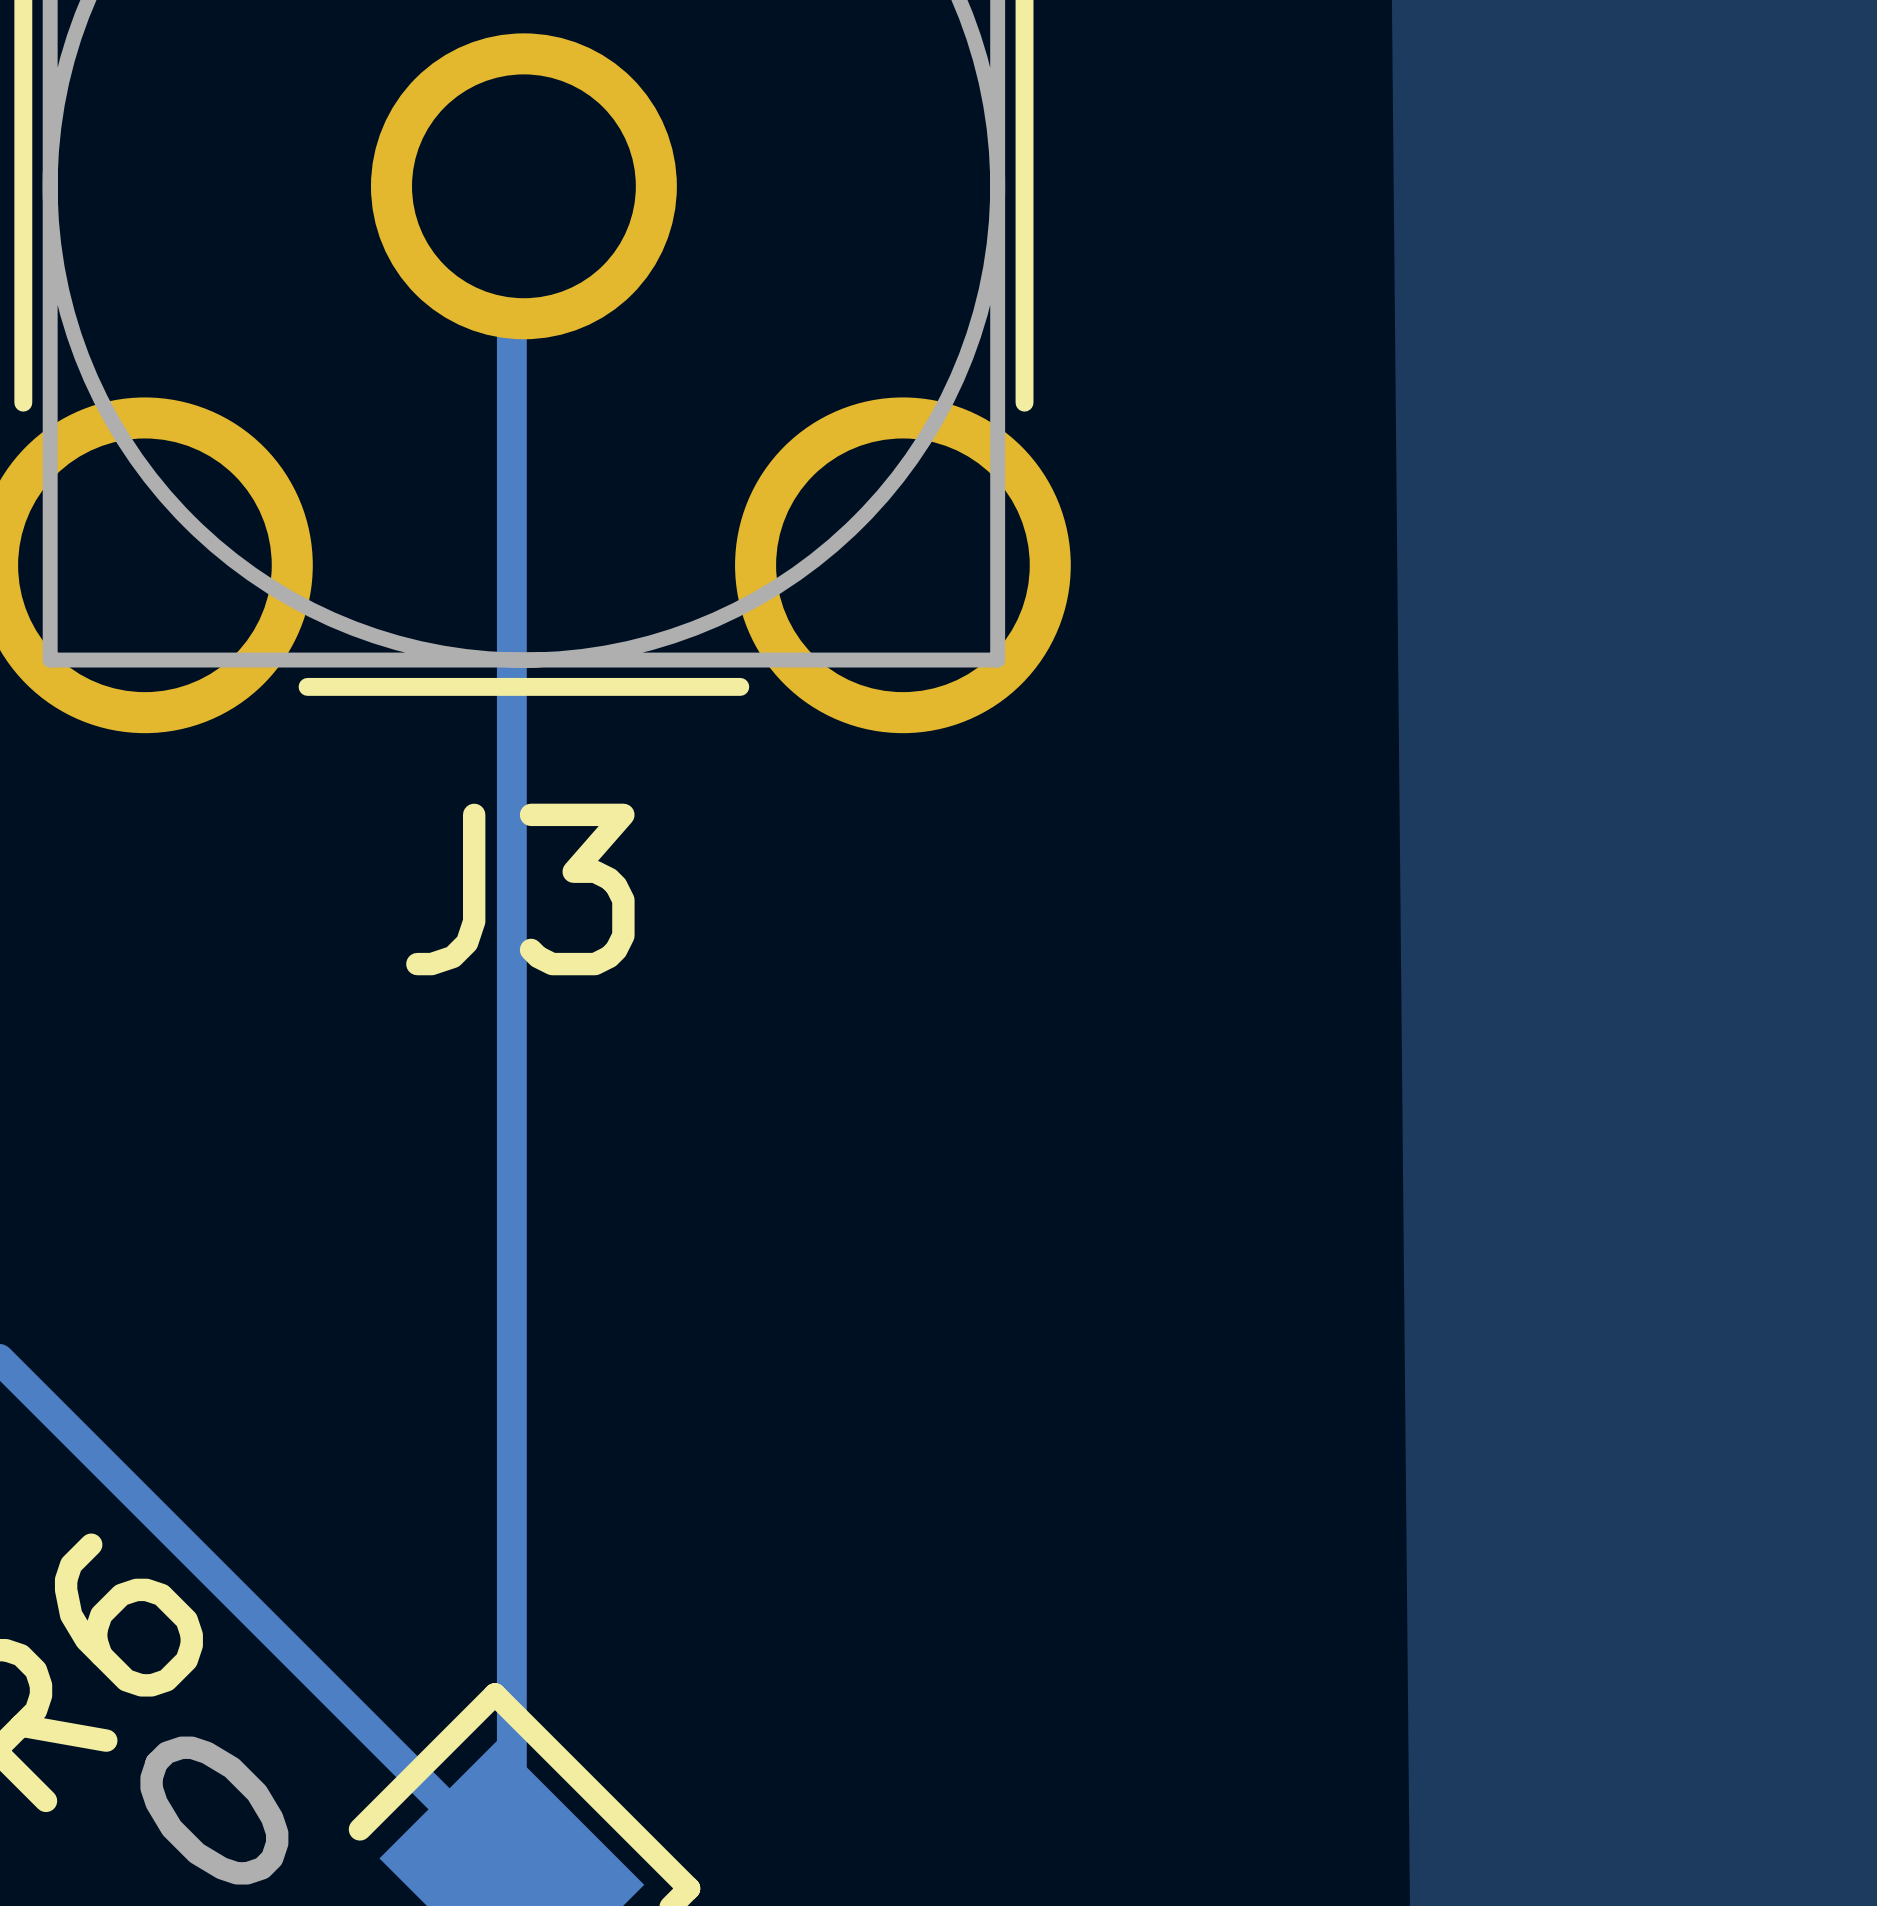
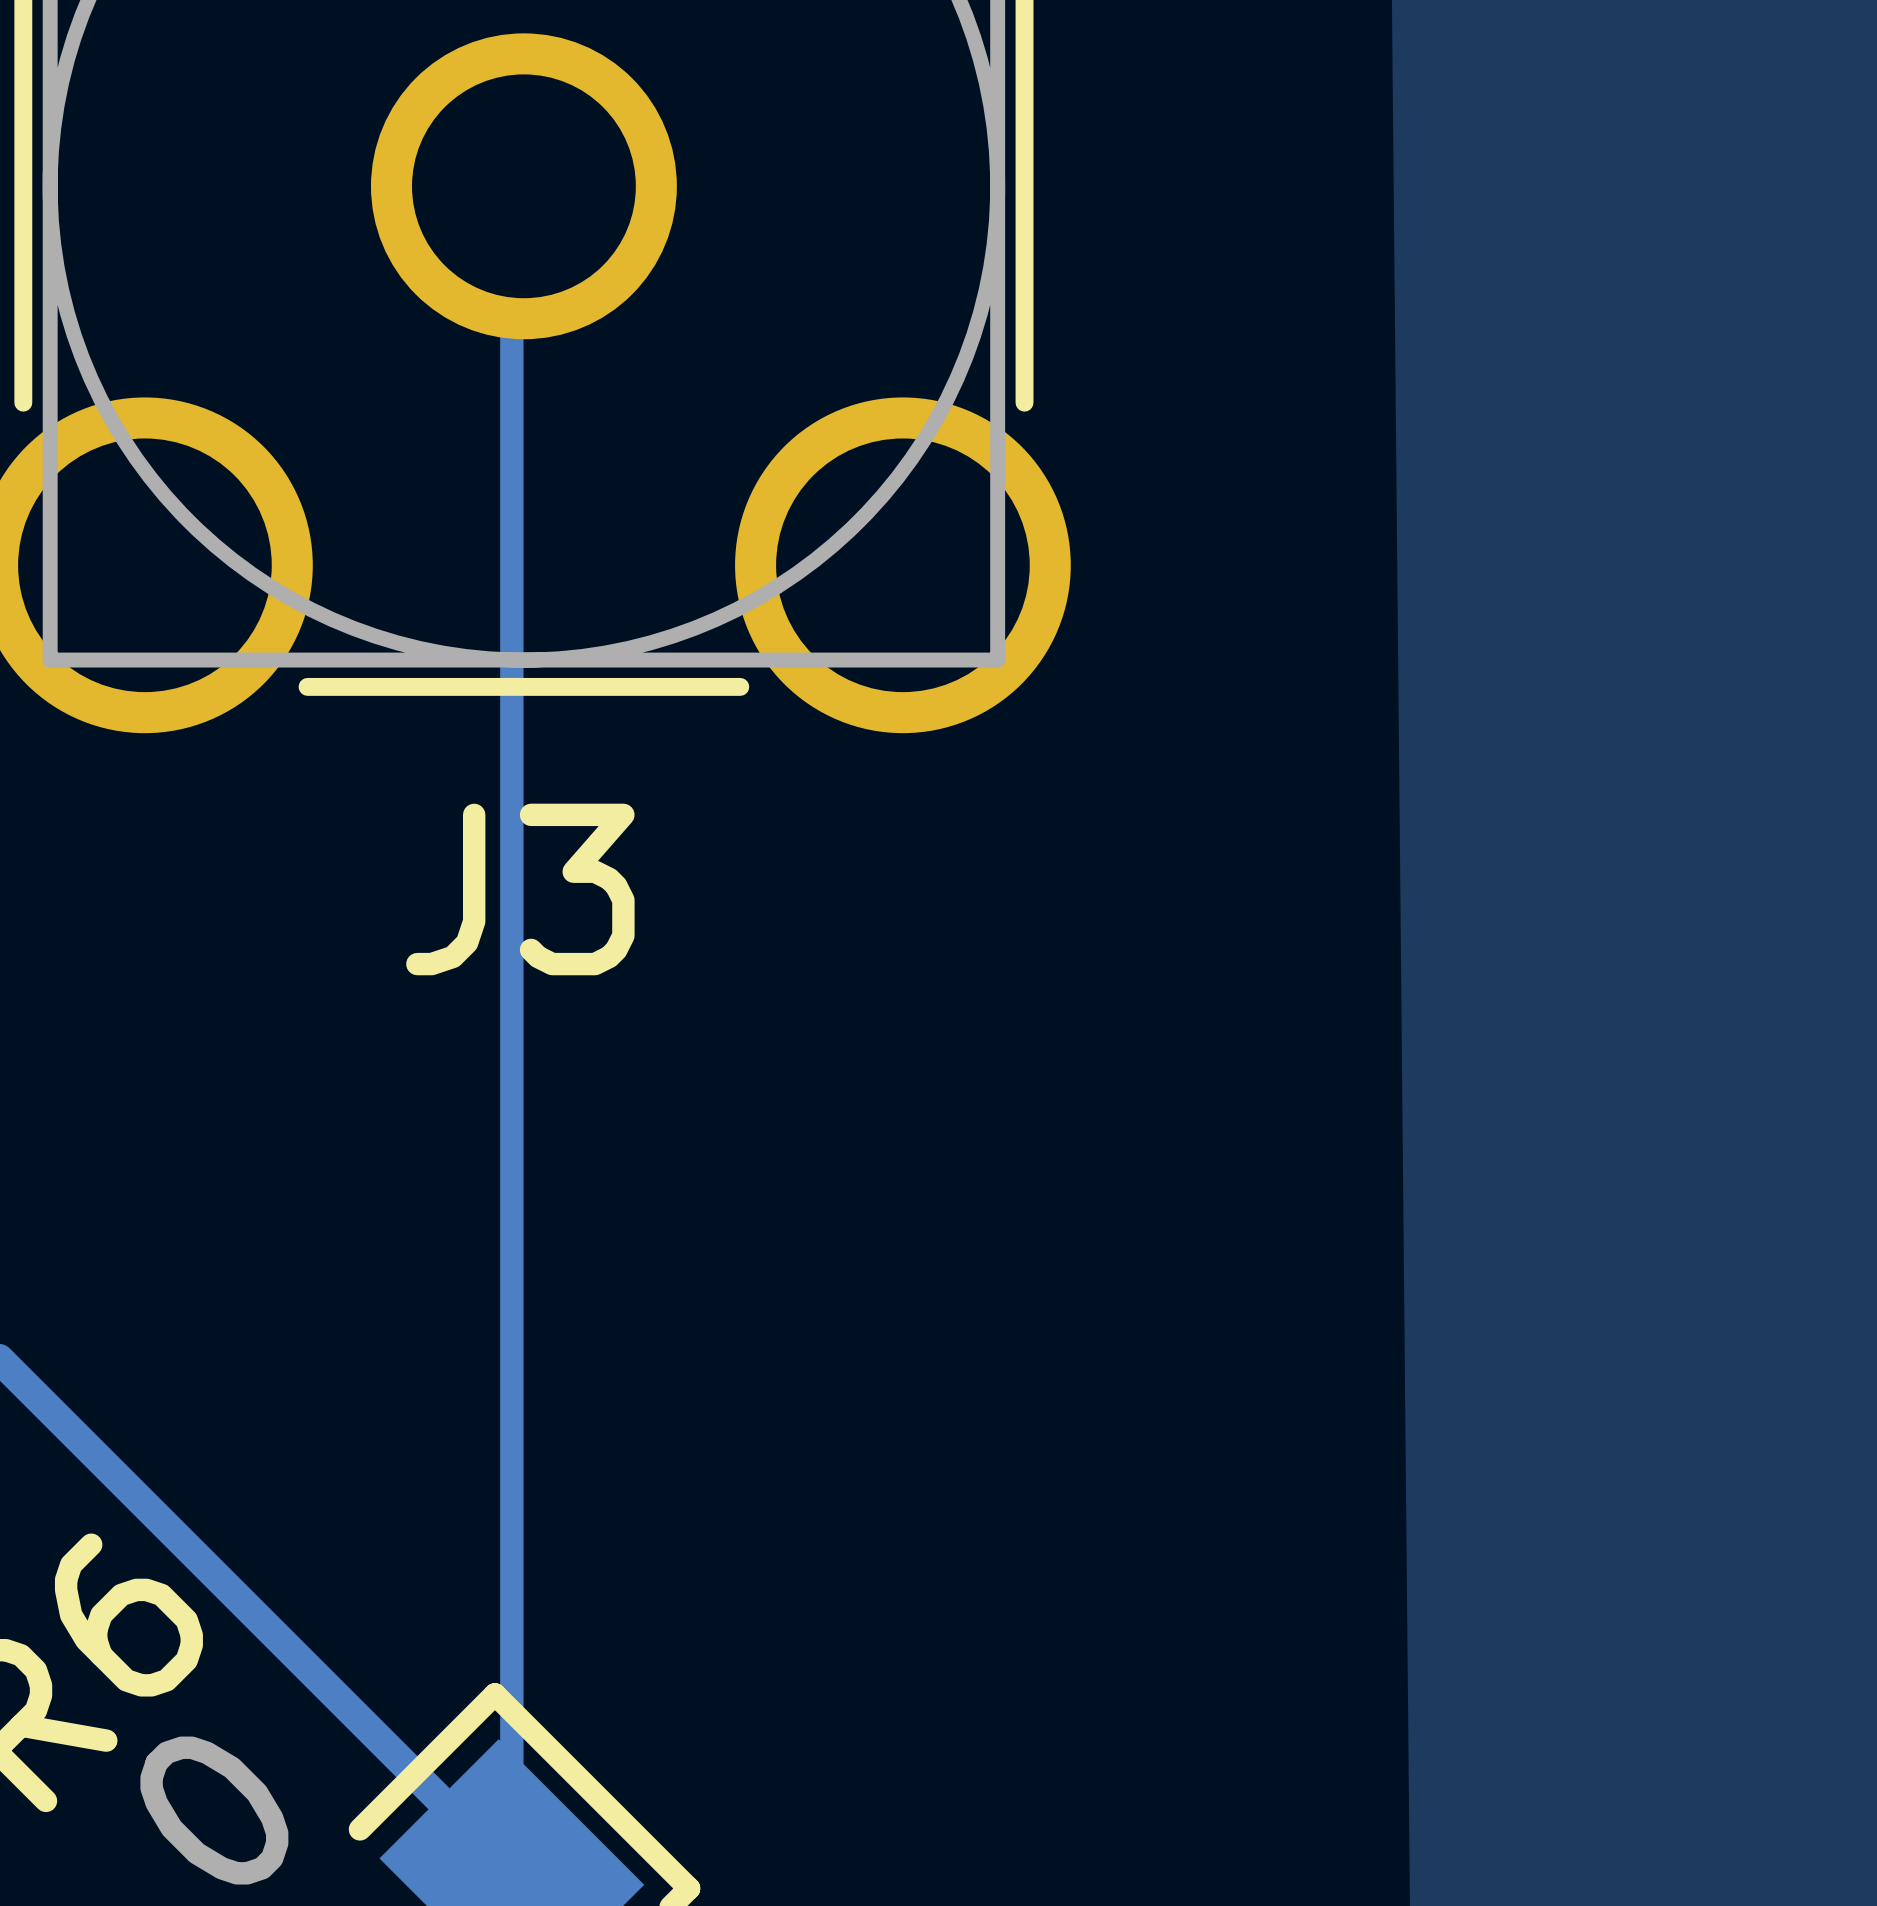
bottom track width: thick (511, 198) (511, 1871) -> thin (511, 198) (511, 1871)

